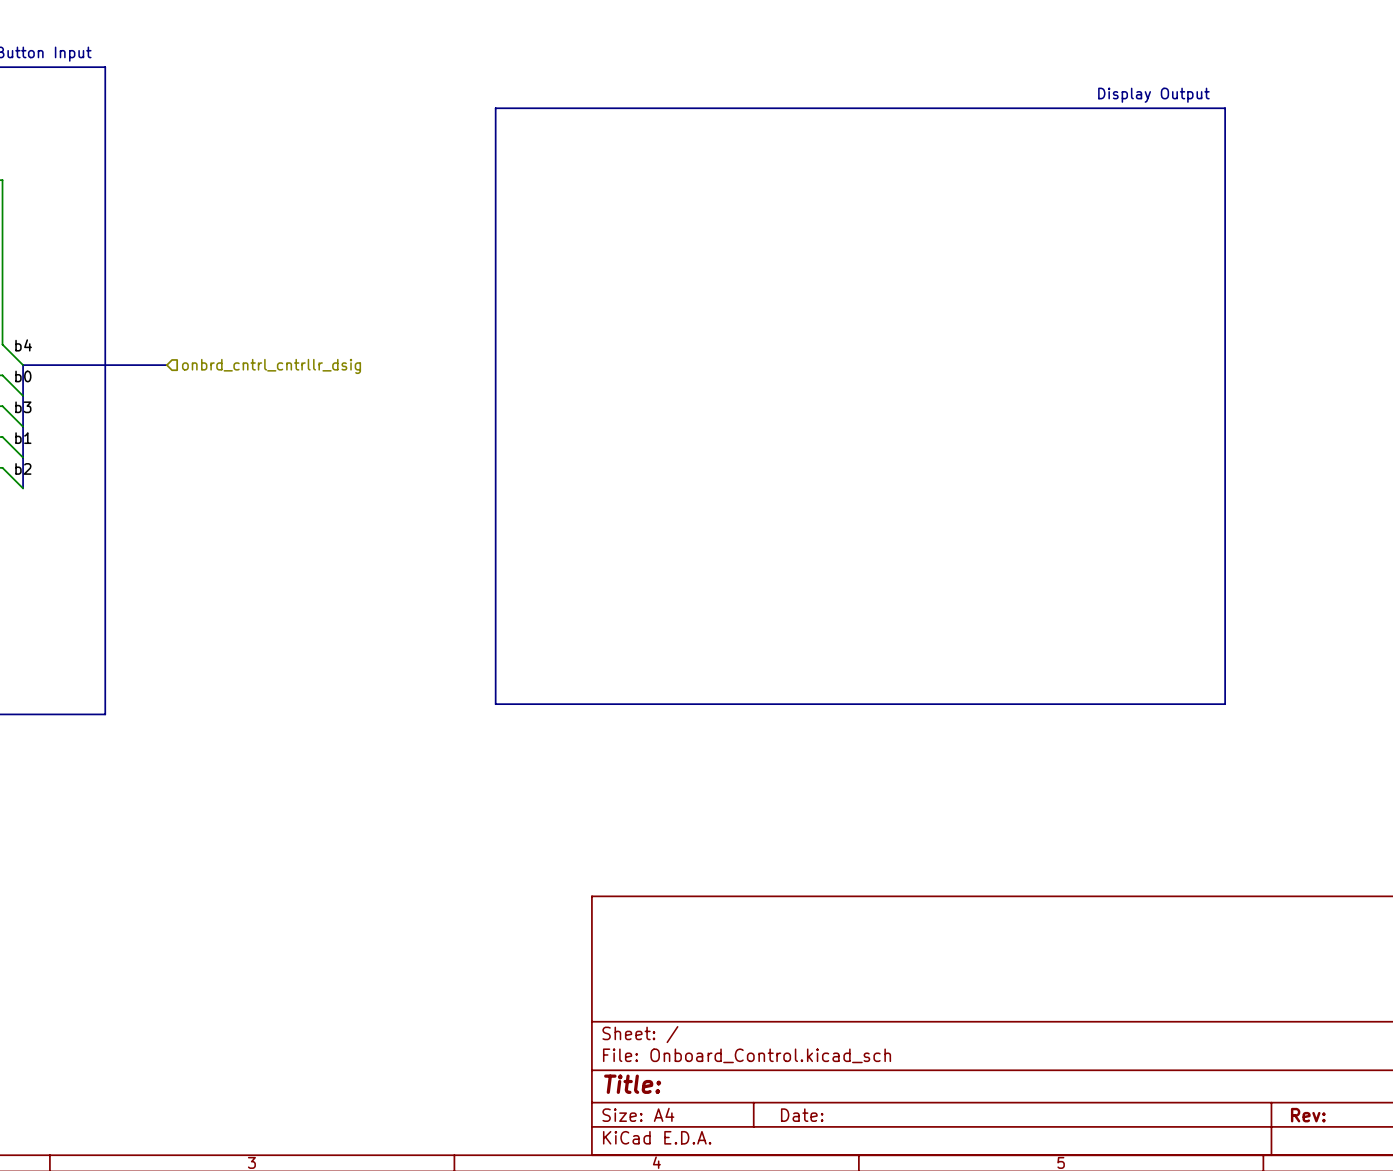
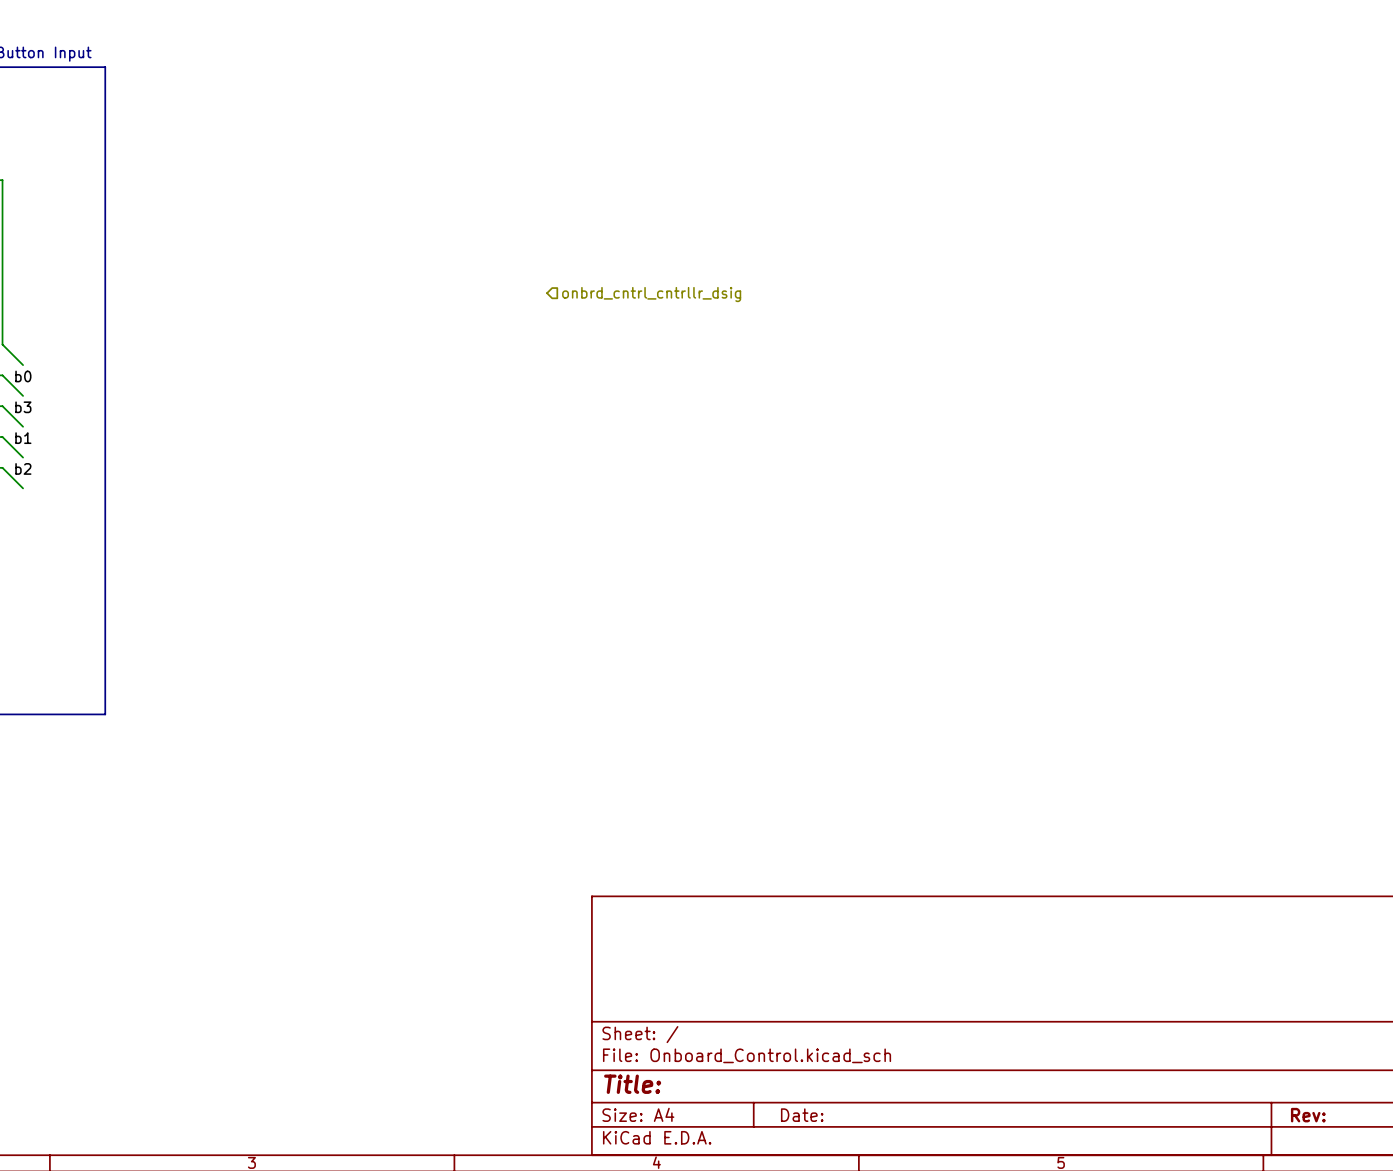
text: Display Output (1153, 95) -> none
line: (495, 108) (1225, 108) (1225, 704) (495, 704) (495, 108) -> none
hierarchical label: none -> onbrd_cntrl_cntrllr_dsig (651, 294)
label: b4 (23, 345) -> none
bus: (166, 365) (23, 365) (23, 488) -> none
hierarchical label: onbrd_cntrl_cntrllr_dsig (271, 366) -> none

